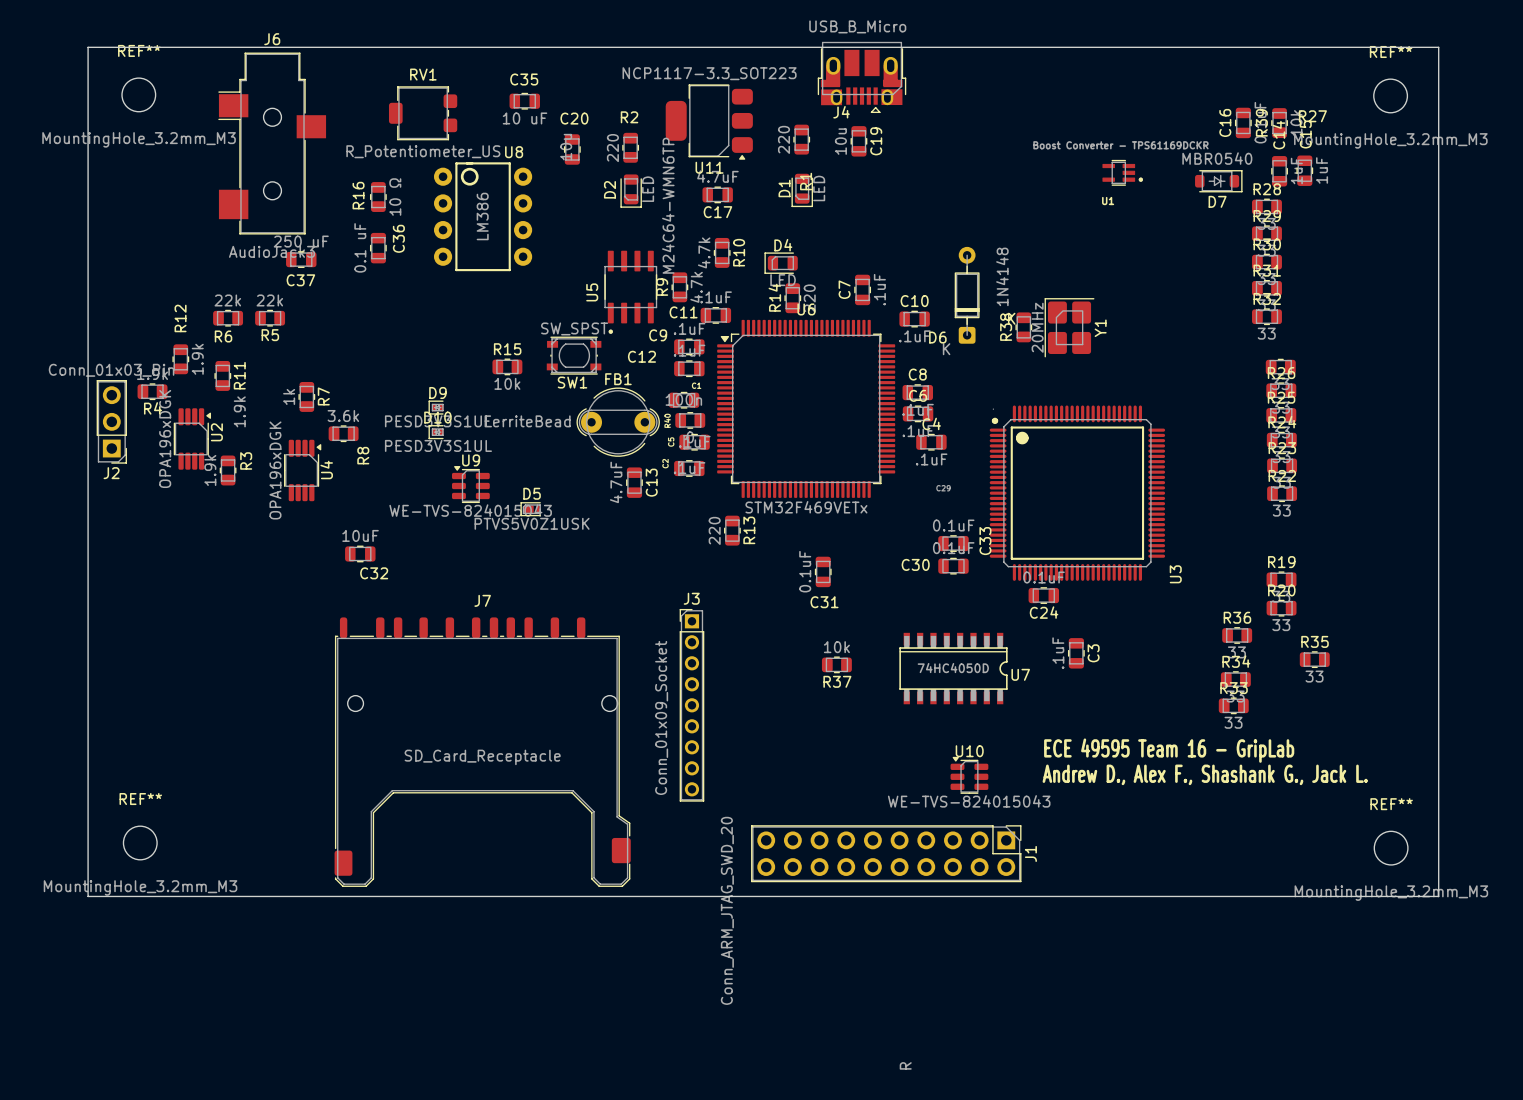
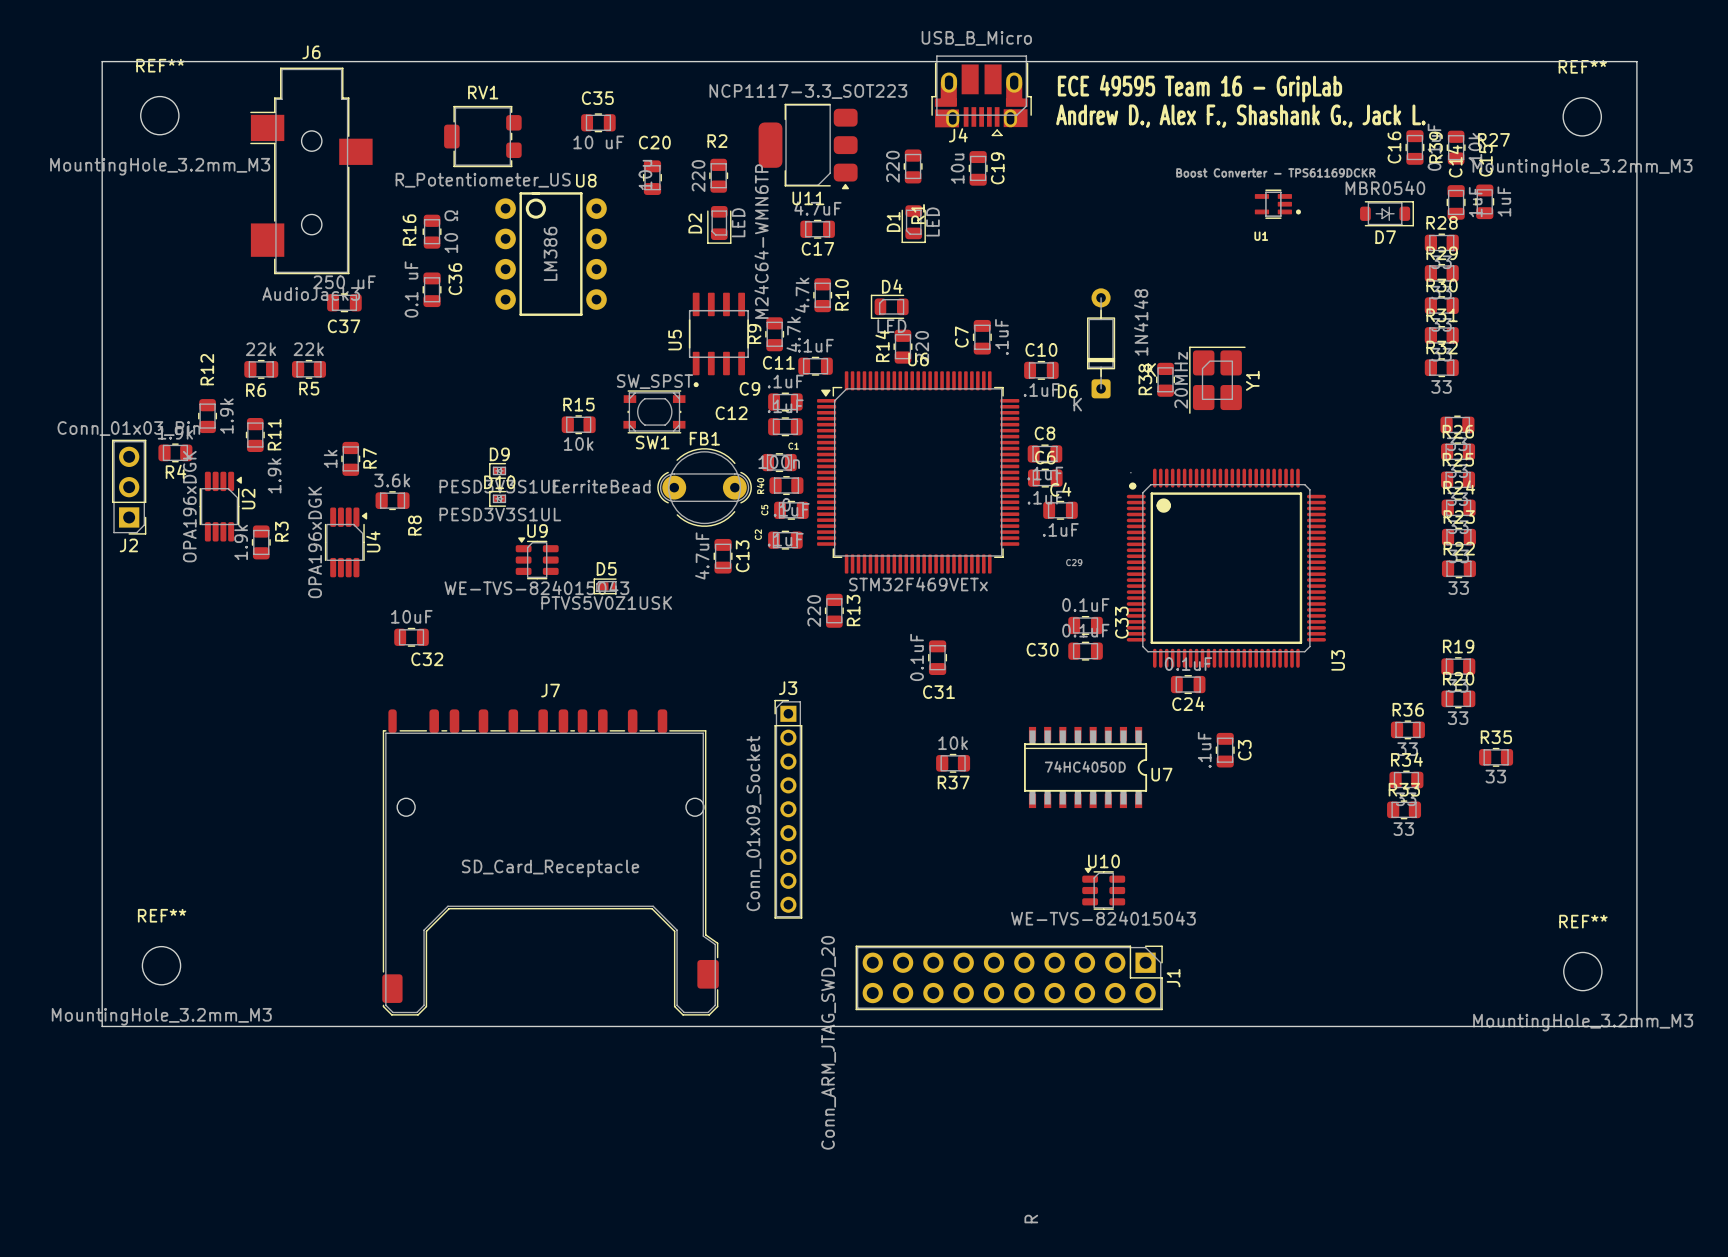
text: none -> ECE 49595 Team 16 - GripLab (1199, 88)
text: none -> Andrew D., Alex F., Shashank G., Jack L. (1240, 116)
text: ECE 49595 Team 16 - GripLab (1169, 750) -> none
text: Andrew D., Alex F., Shashank G., Jack L. (1205, 774) -> none

